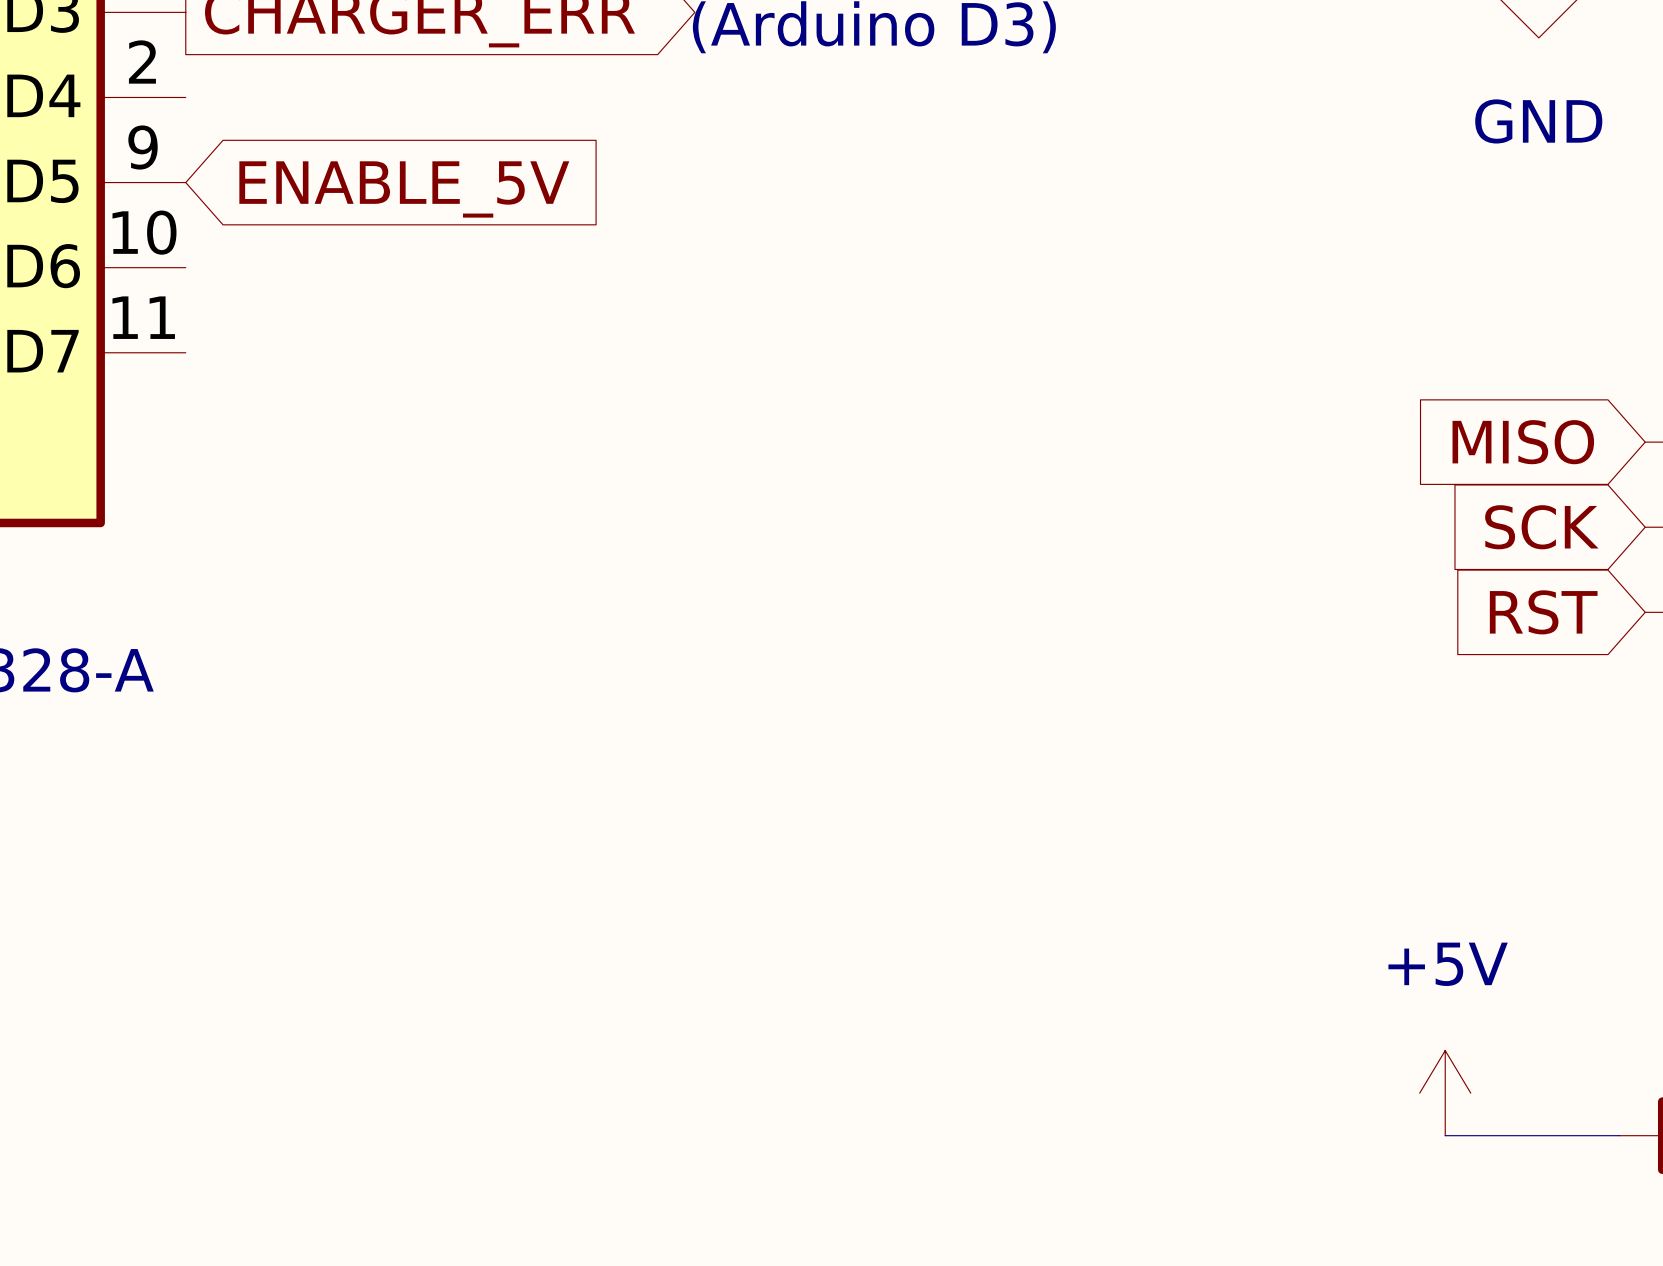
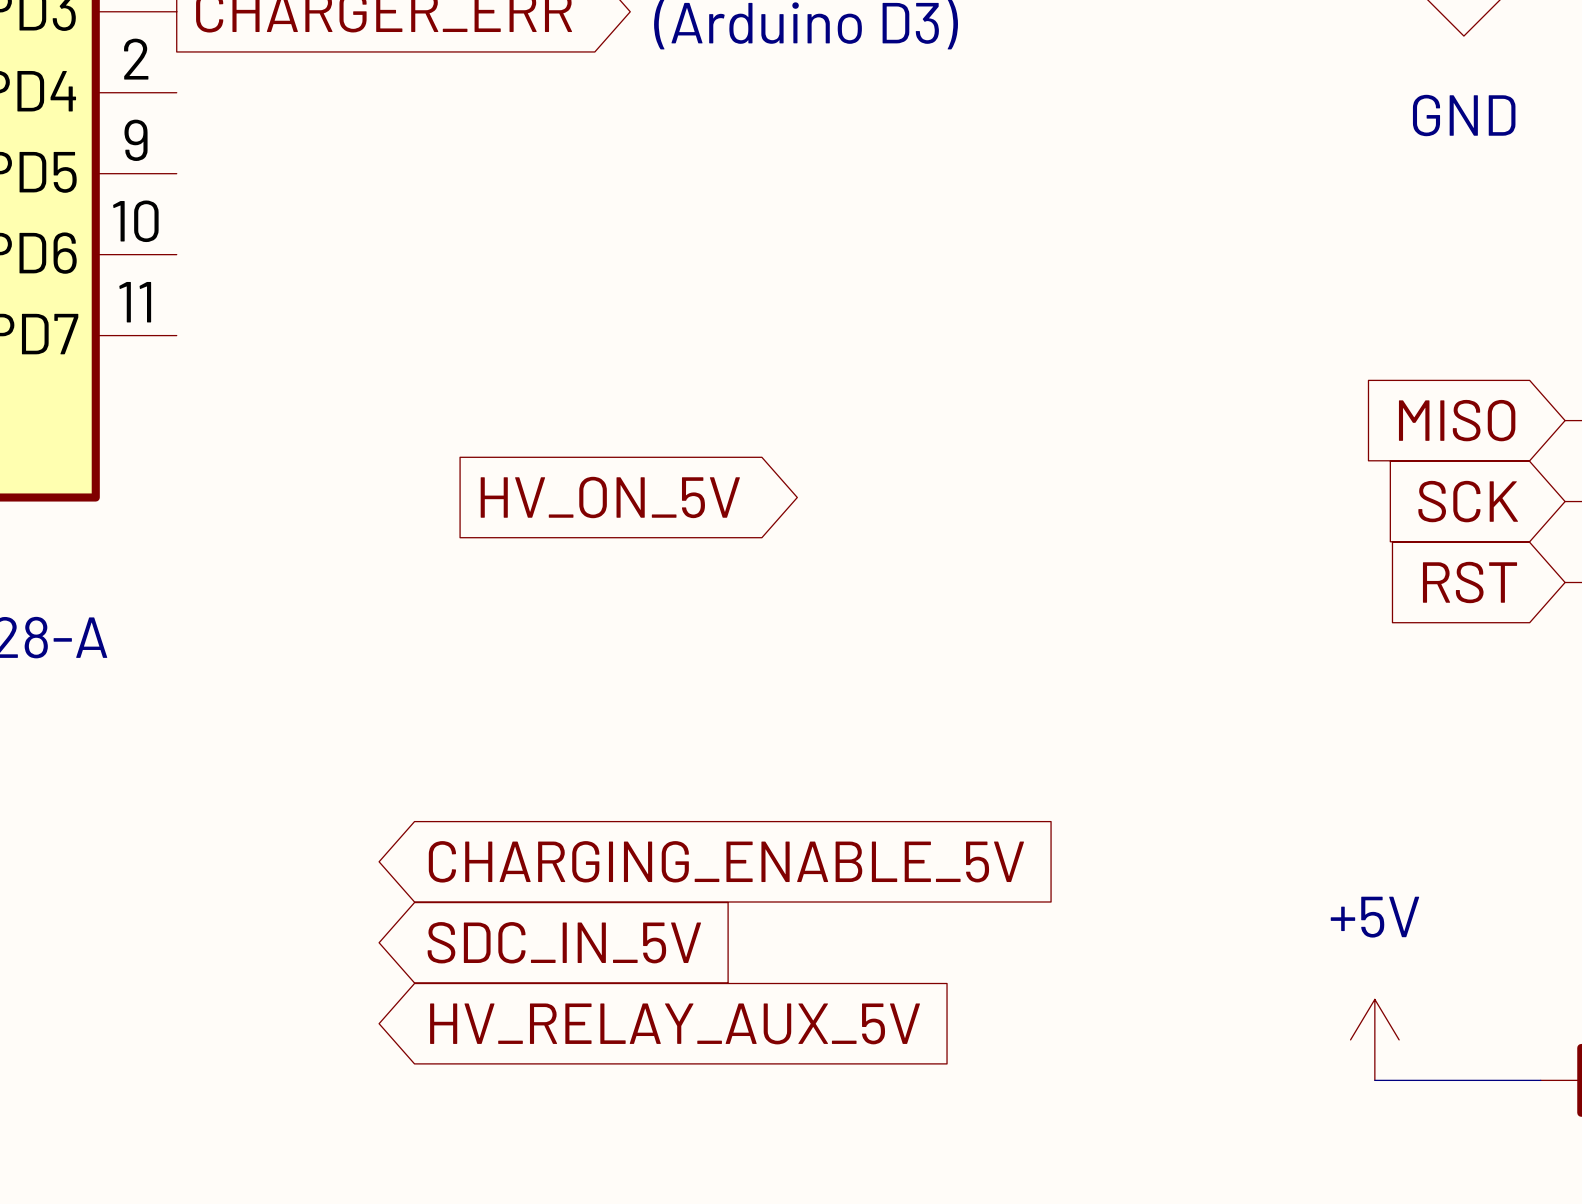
global label: ENABLE_5V (404, 189) -> none
global label: none -> HV_ON_5V (610, 497)
global label: none -> CHARGING_ENABLE_5V (726, 861)
global label: none -> SDC_IN_5V (564, 942)
global label: none -> HV_RELAY_AUX_5V (675, 1023)

